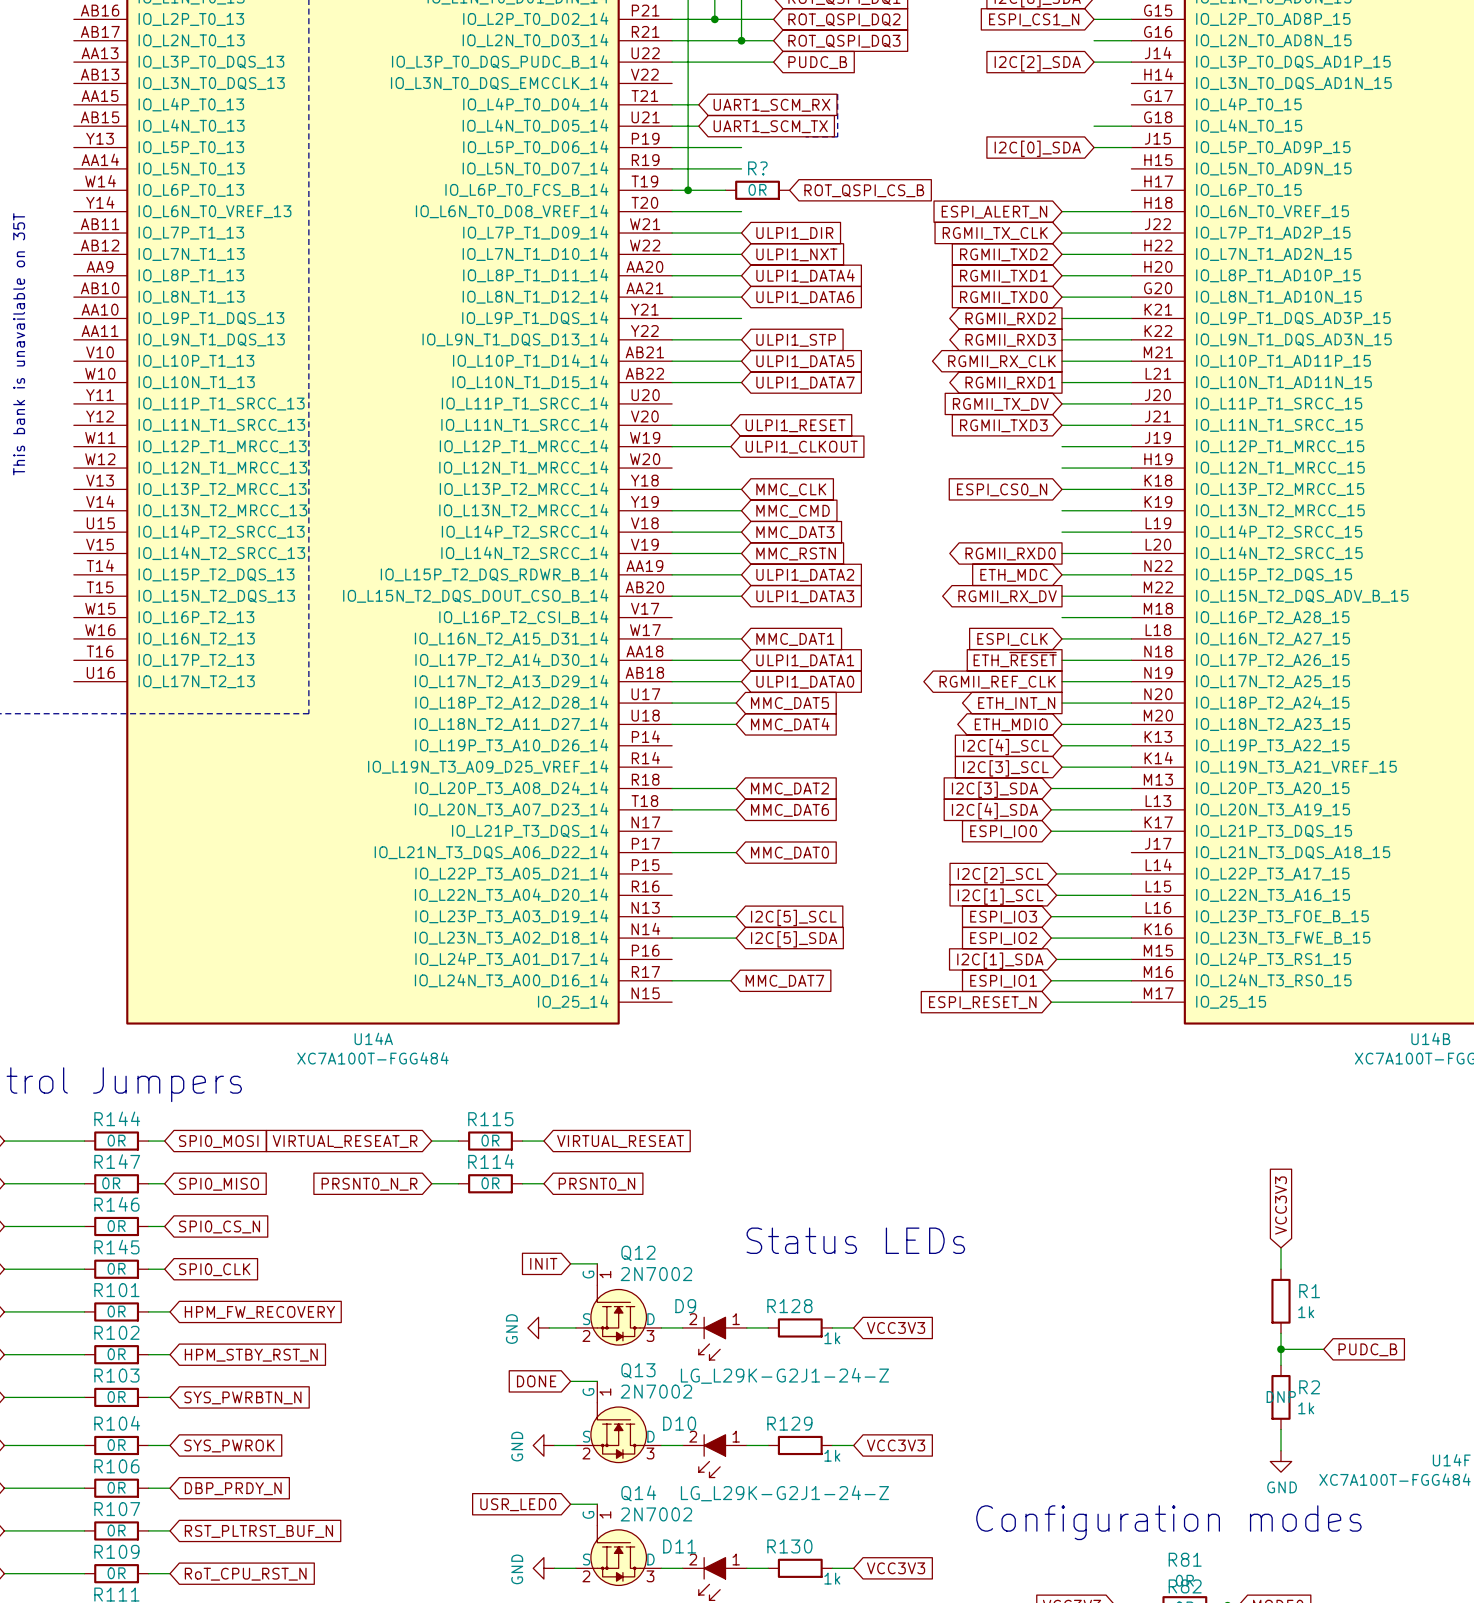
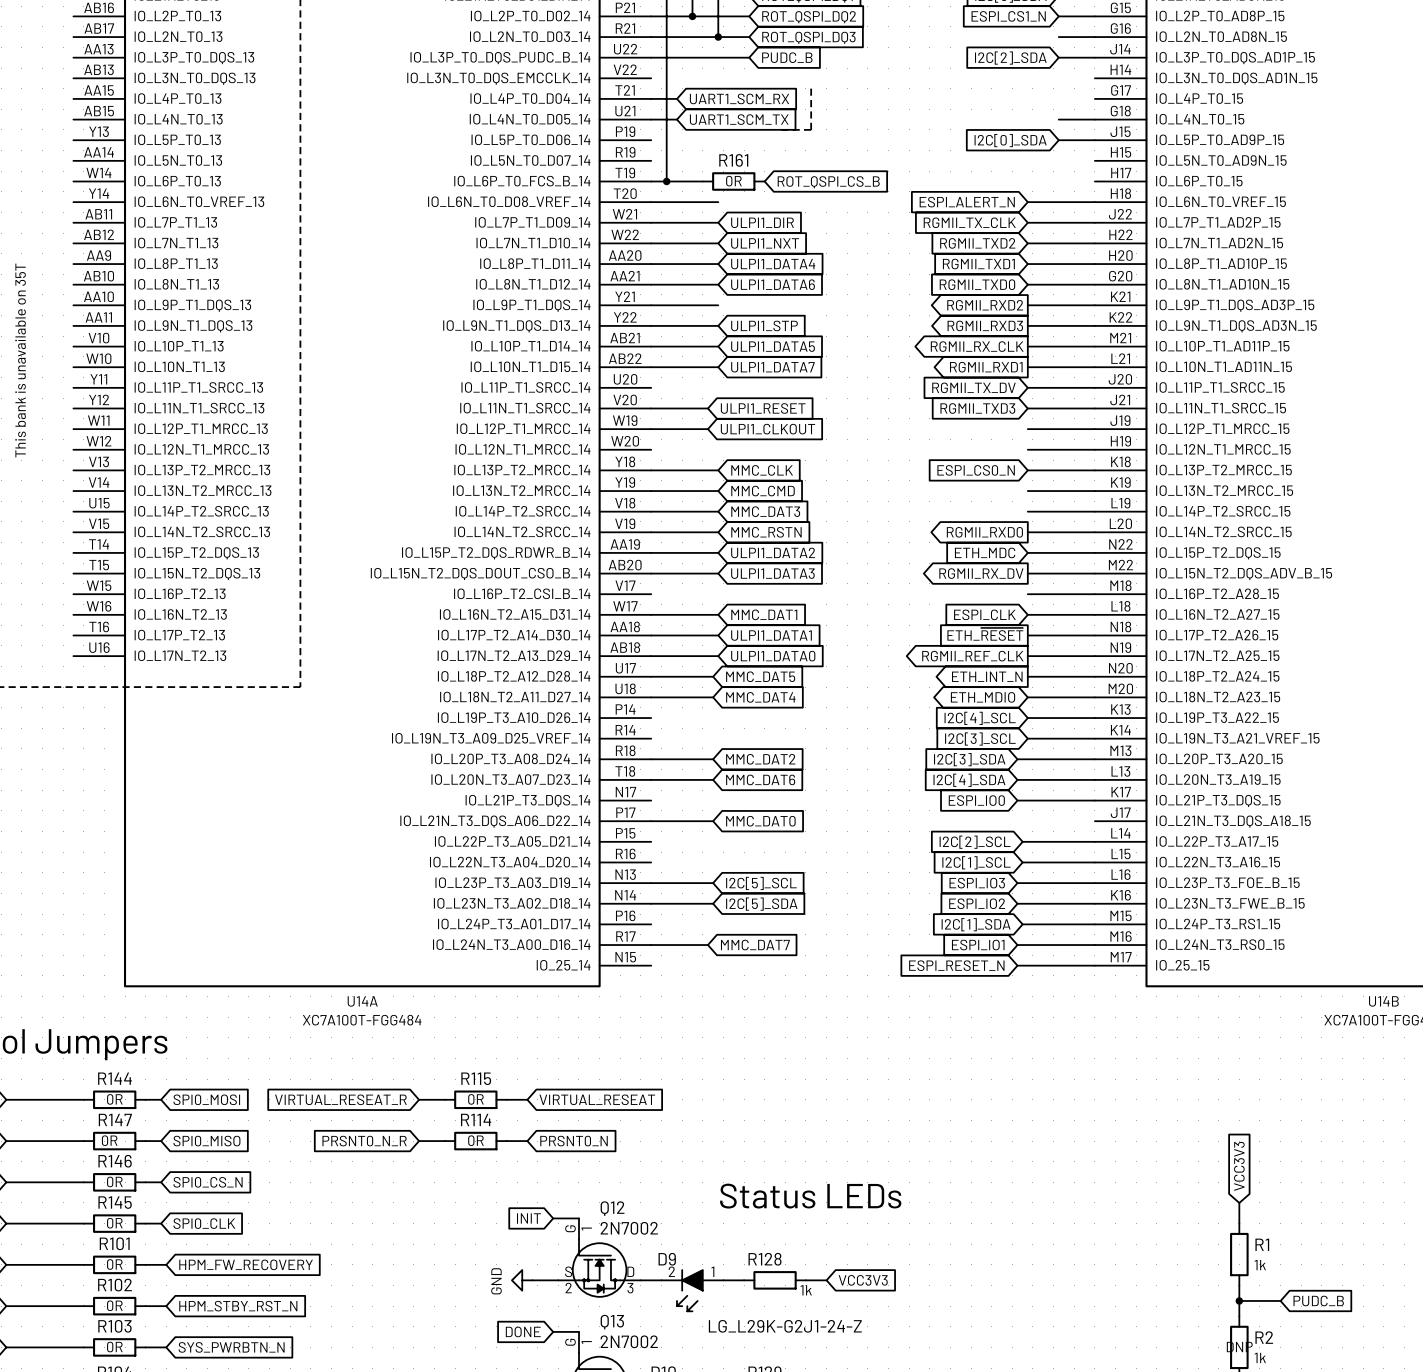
wire: (672, 147) (741, 147) -> none
wire: (672, 168) (741, 168) -> none
R? name: R? (757, 168) -> R161 (733, 160)

